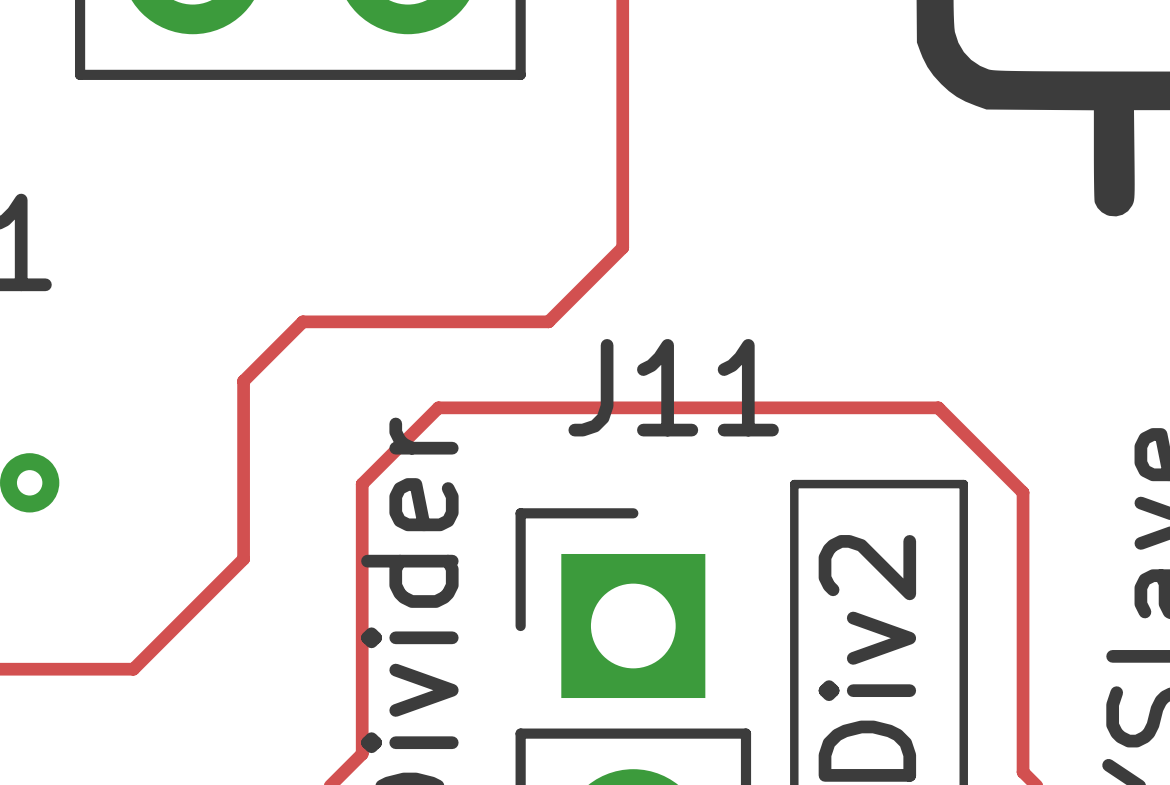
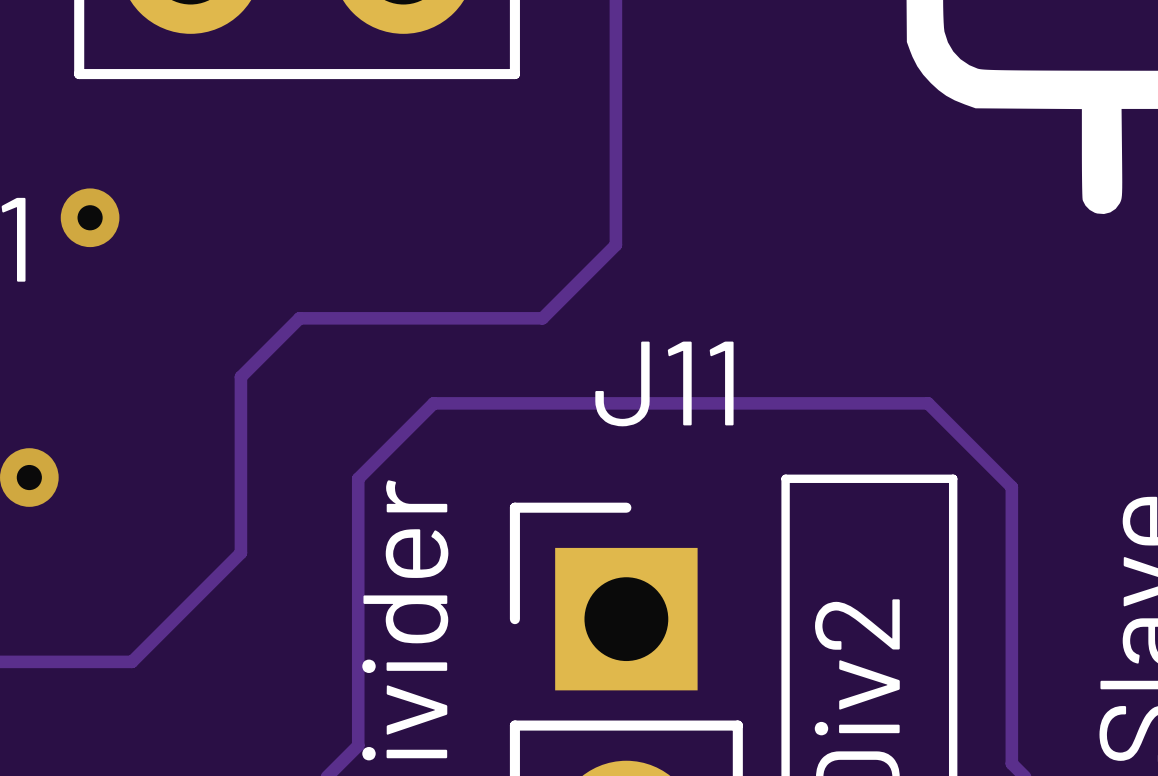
via: none -> (90, 217)

